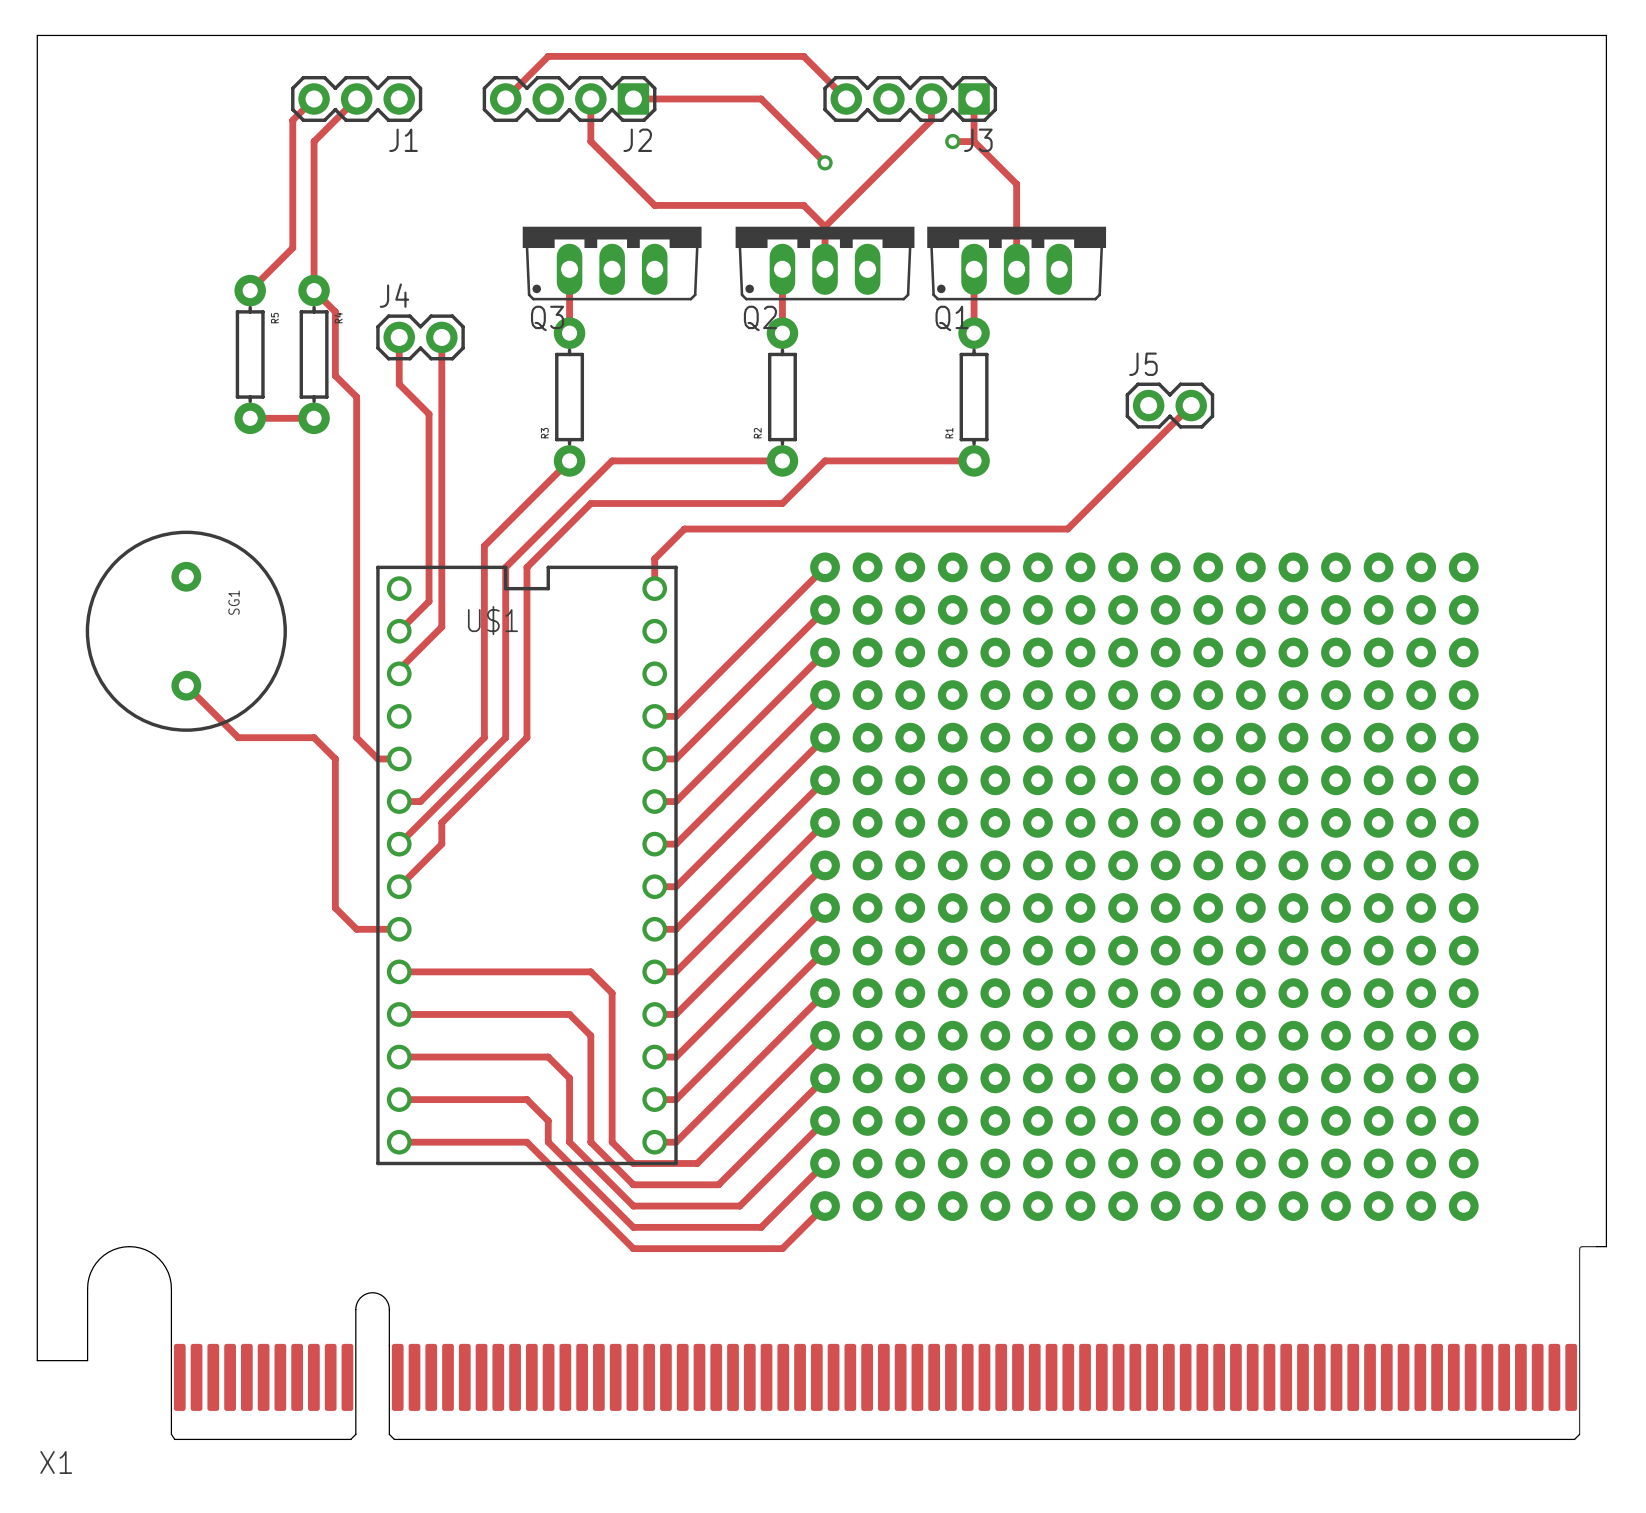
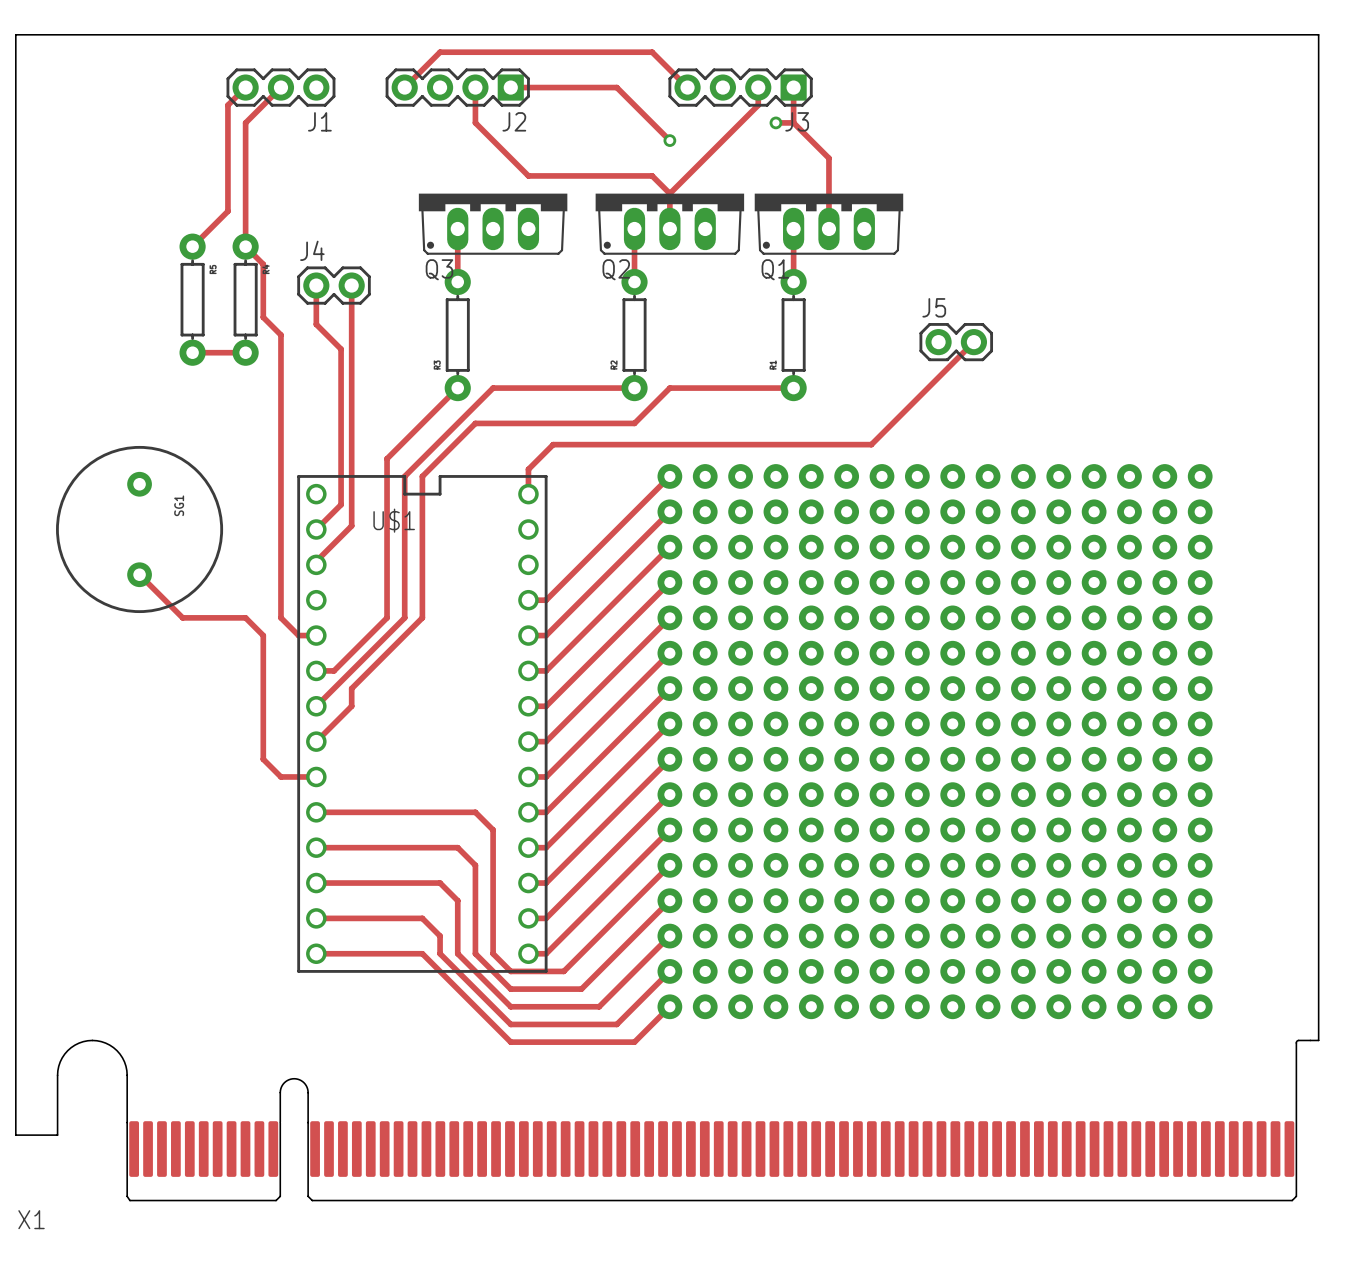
X1 footprint: [37, 1246, 1597, 1440] -> [15, 1040, 1311, 1201]

